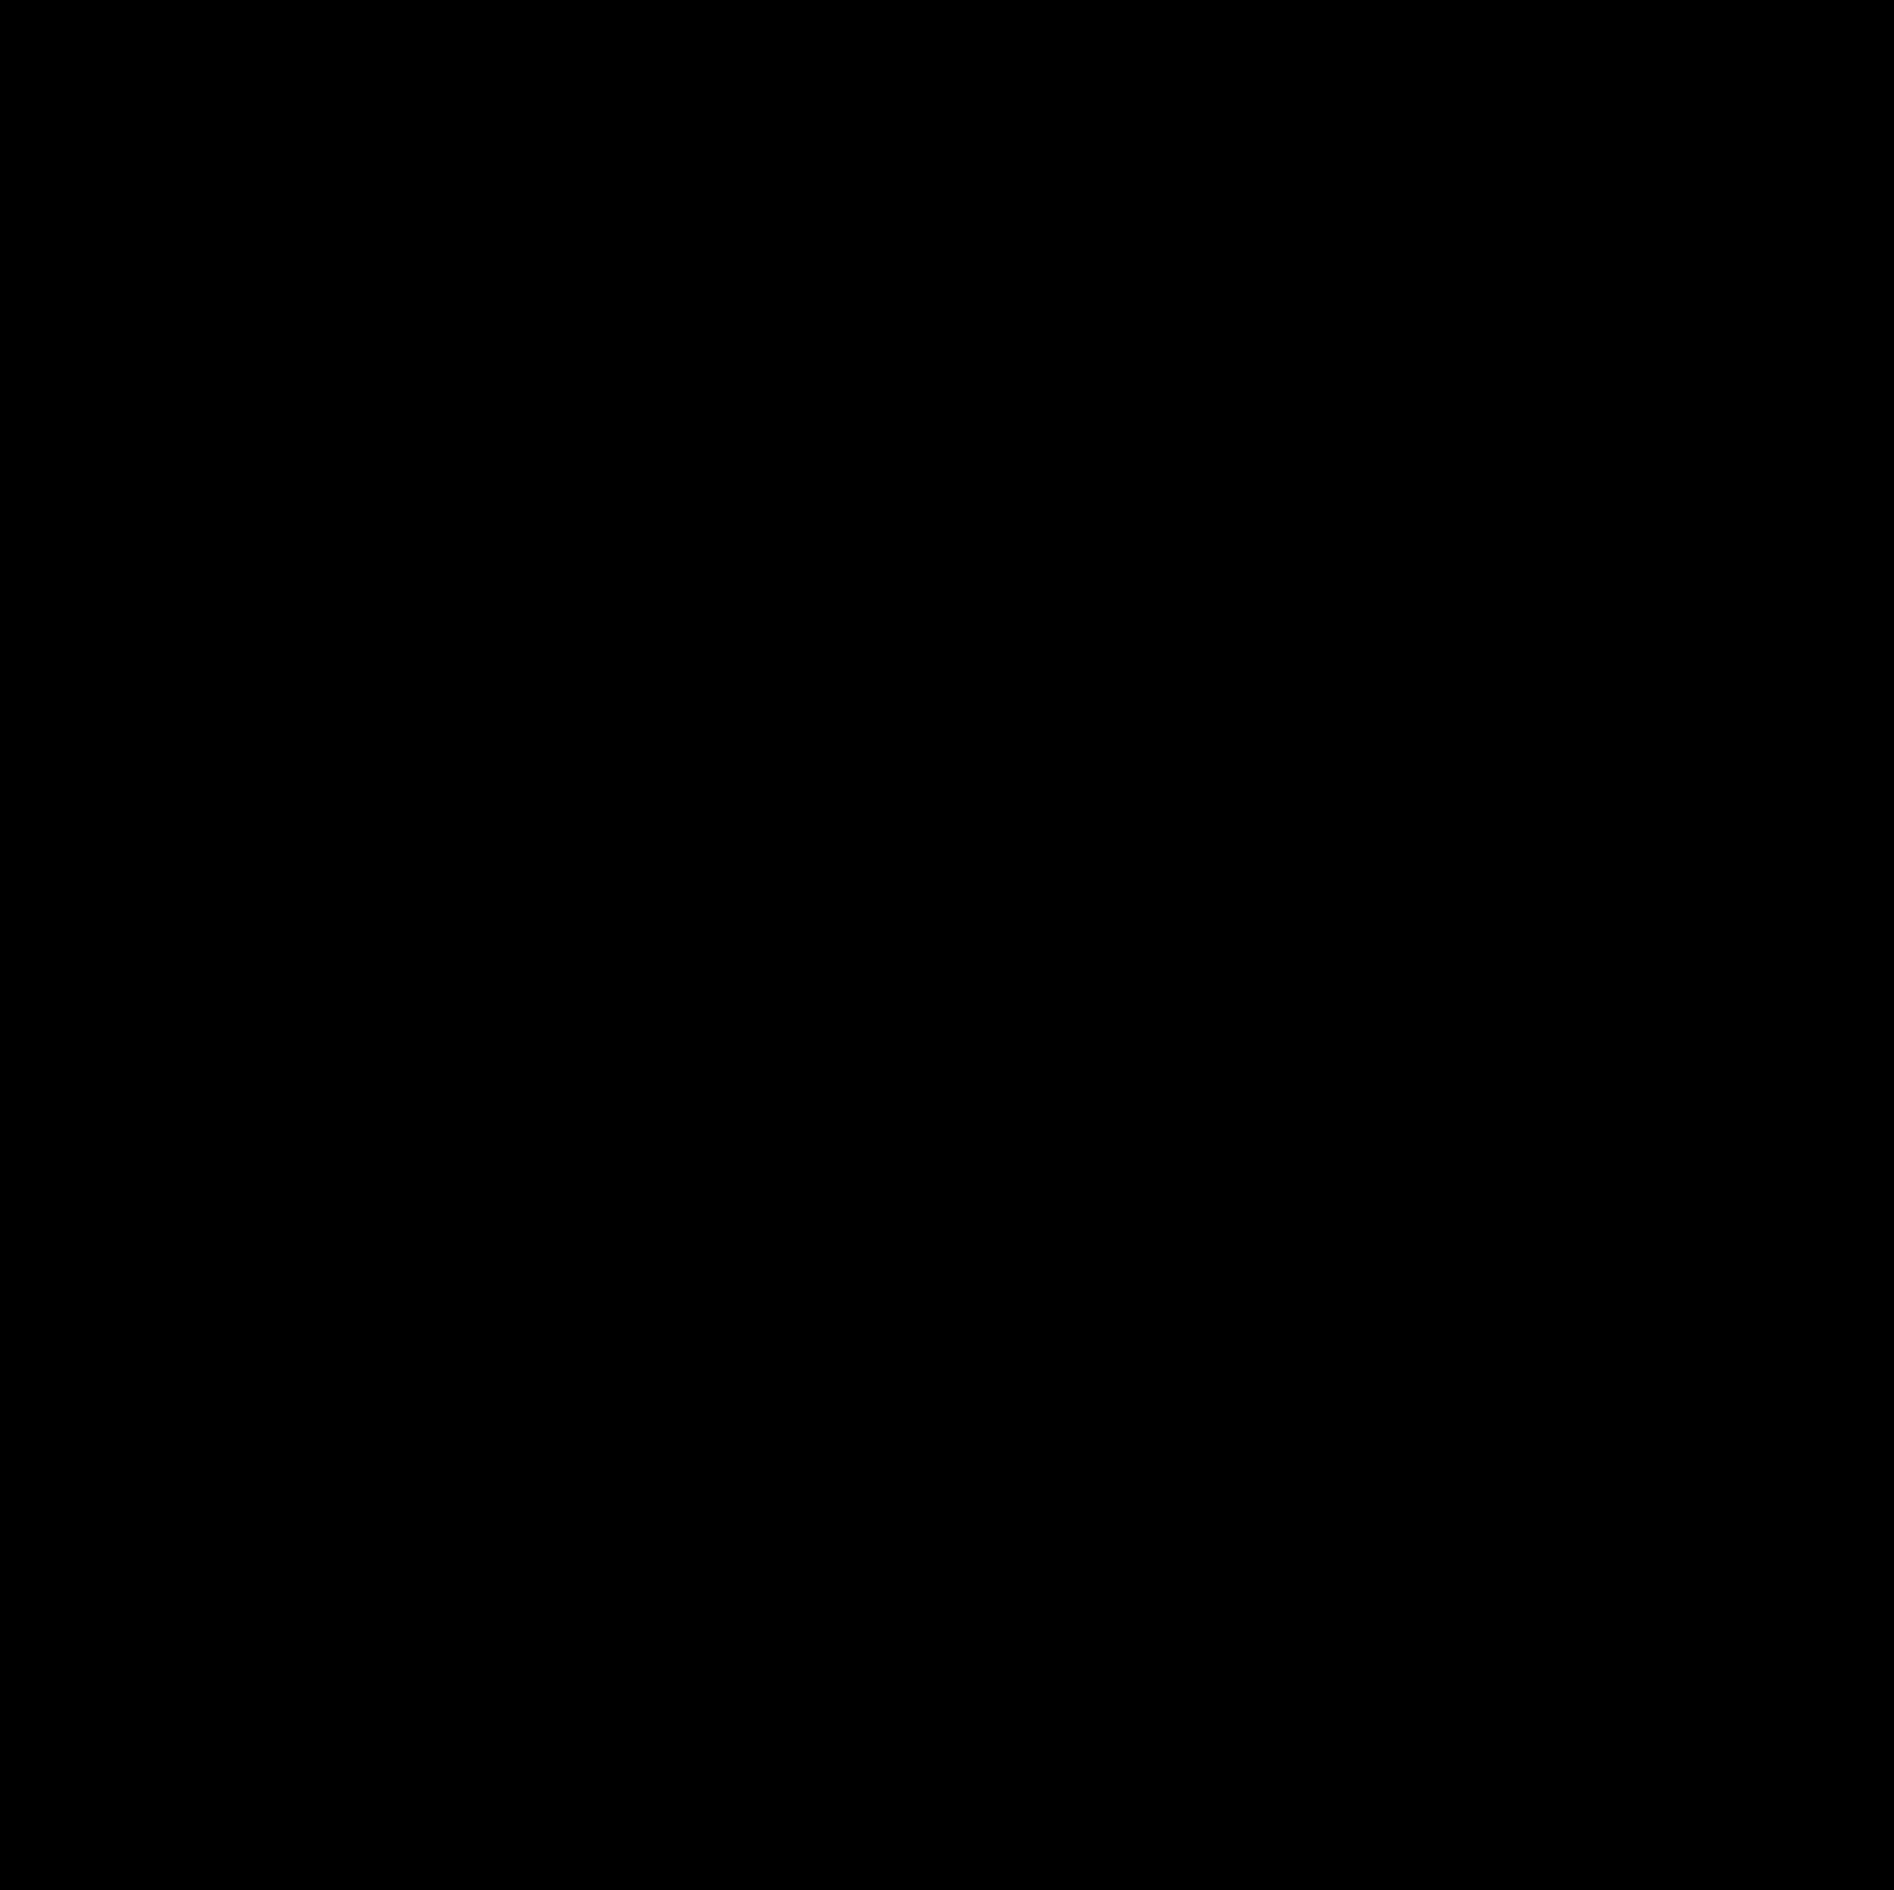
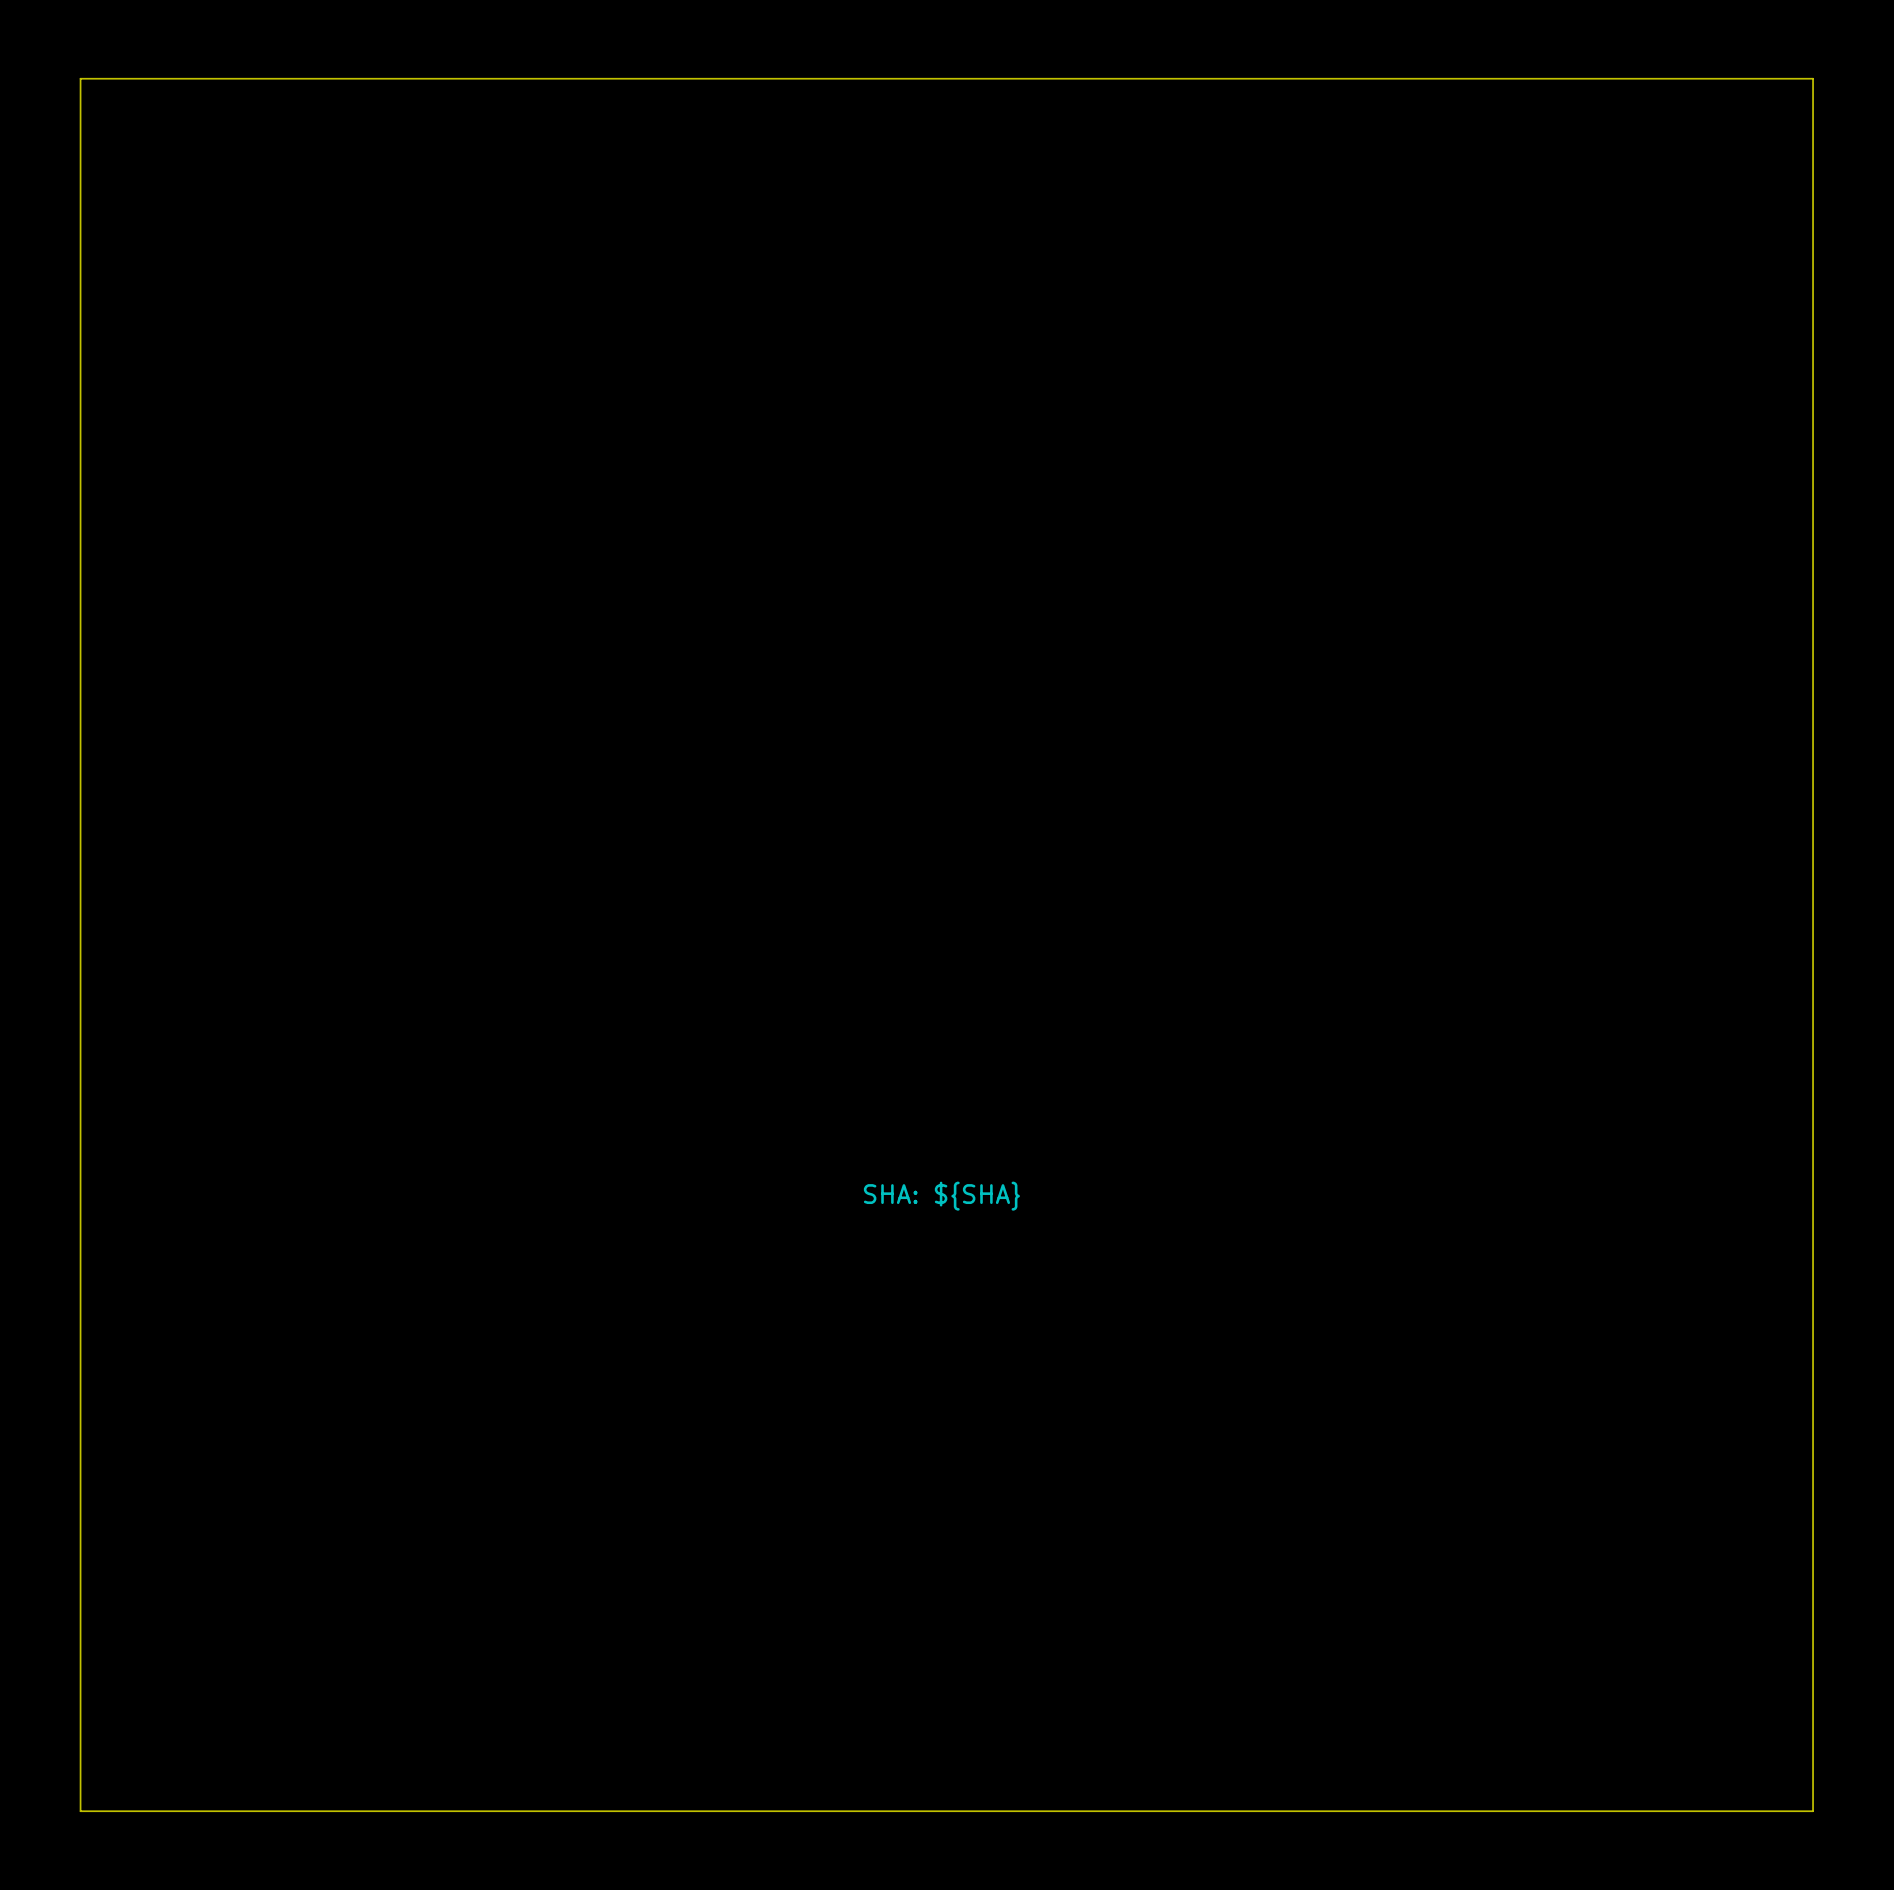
board edge: none -> (80, 78) (1813, 78) (1813, 1811) (80, 1811) (80, 78)
text: none -> SHA: ${SHA} (941, 1196)

